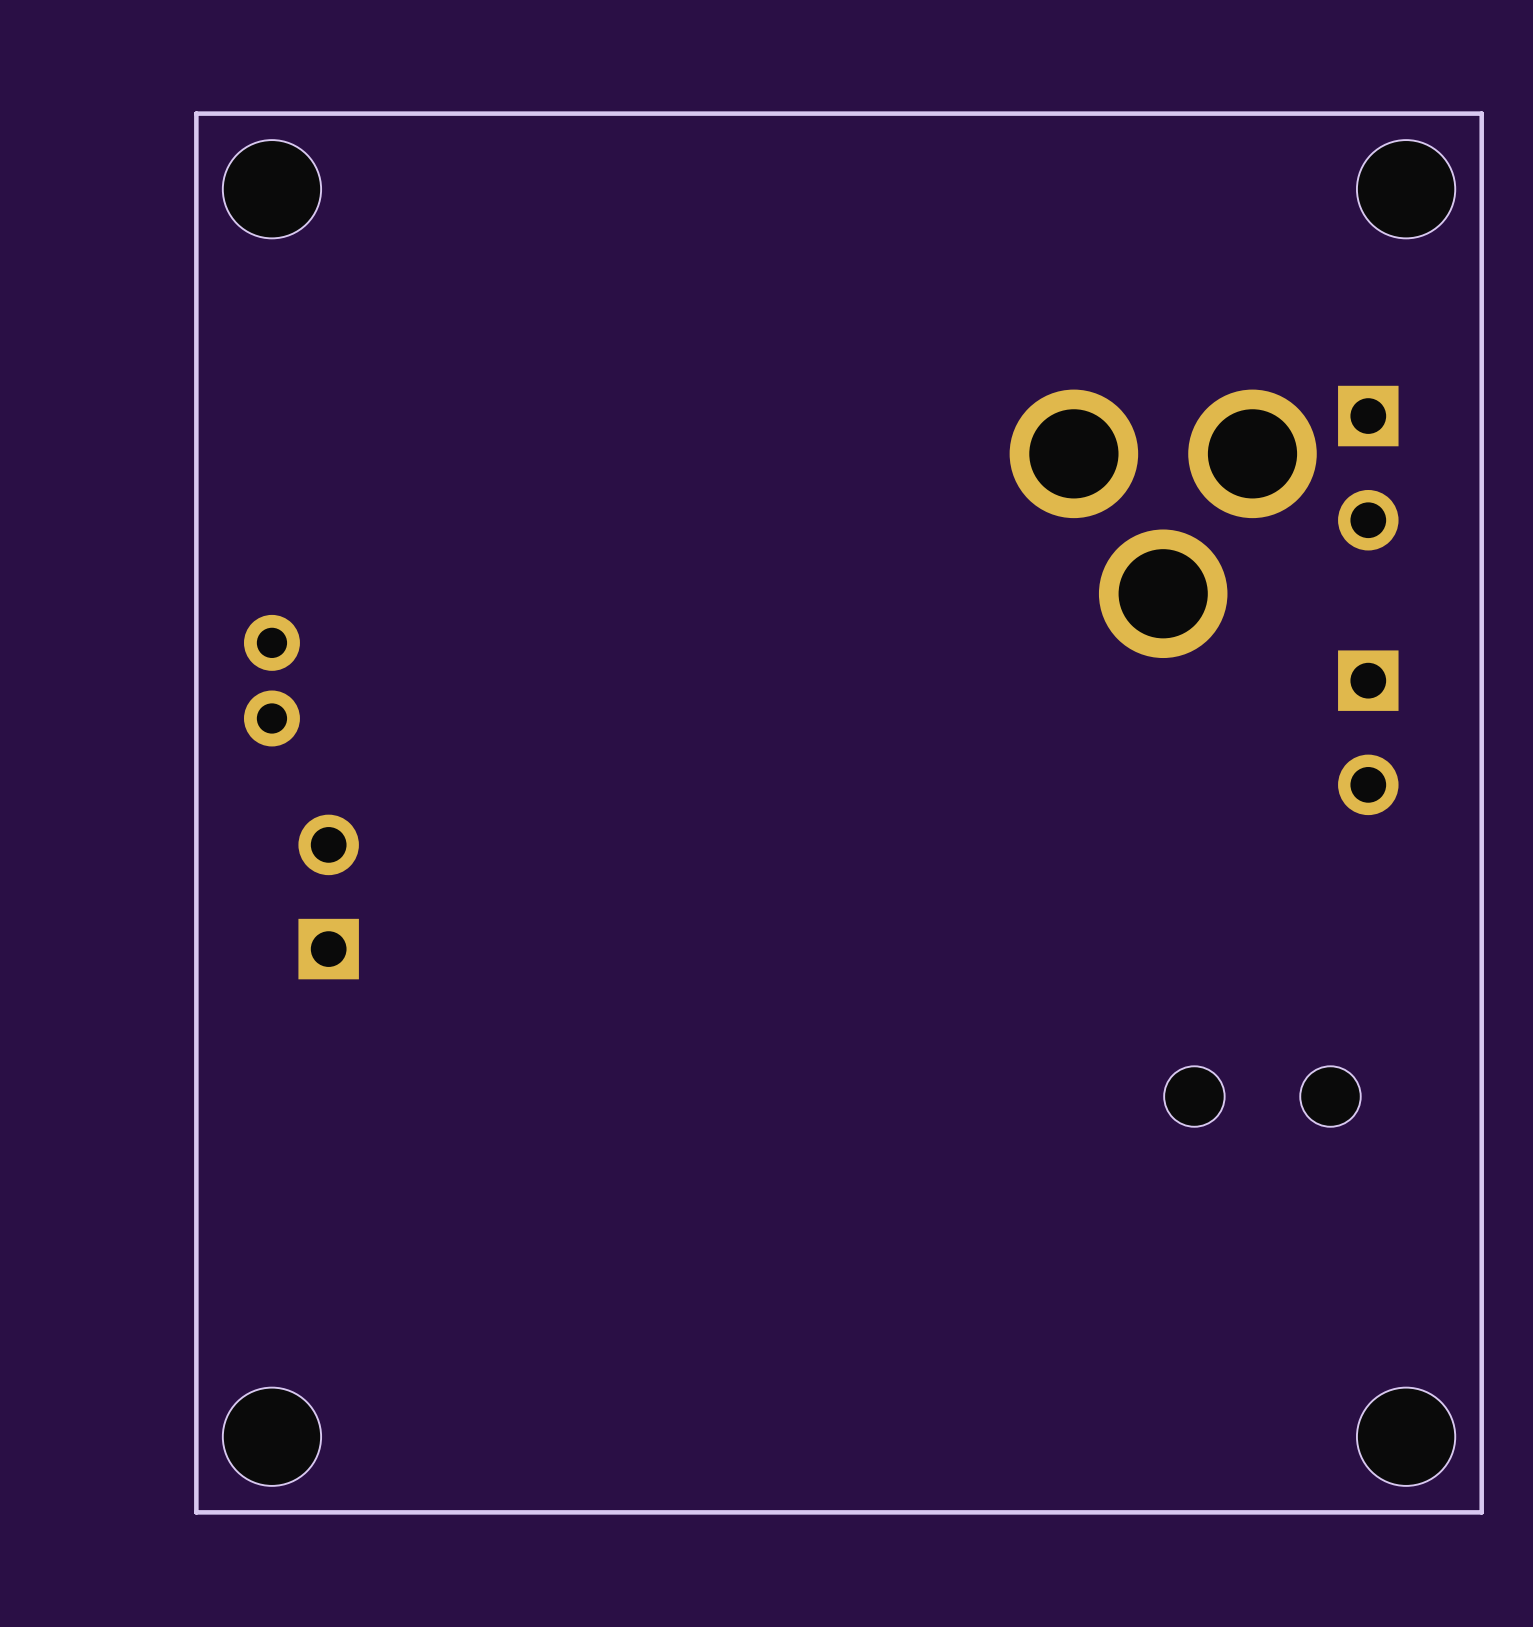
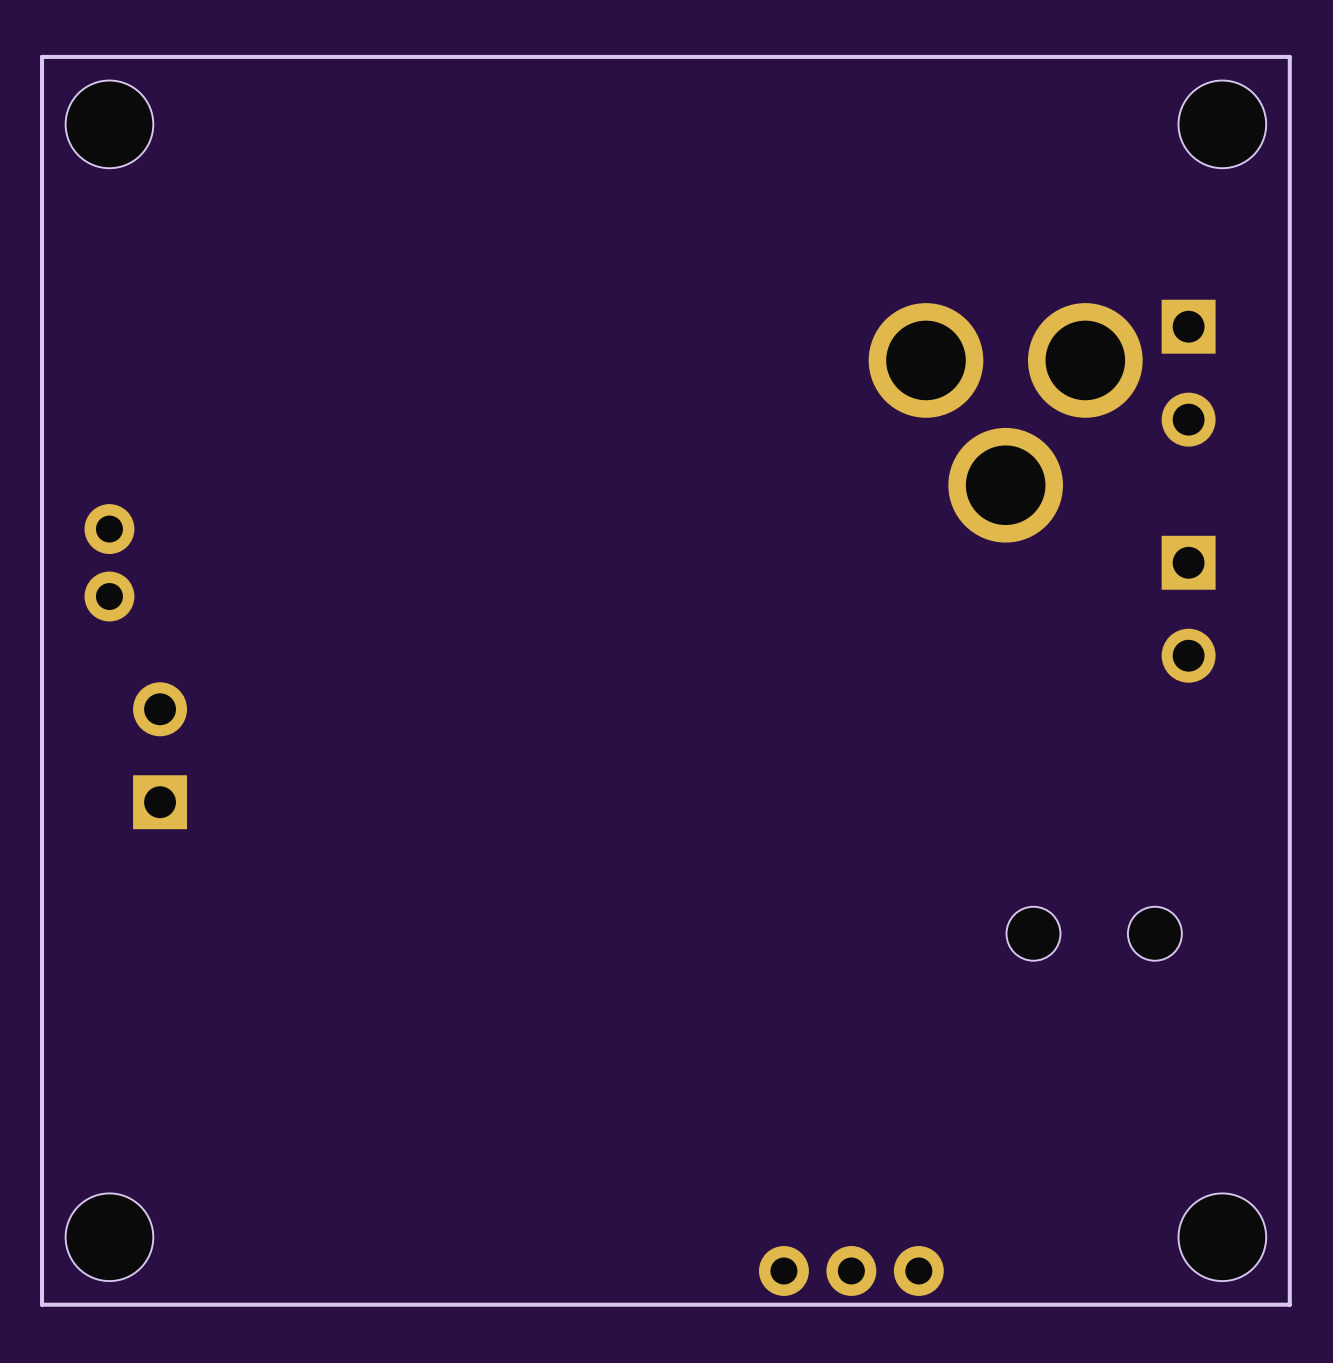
board edge: (196, 113) (196, 1512) -> (143, 56) (42, 56) (42, 1304) (143, 1304)
part position: (271, 189) -> (109, 124)
part position: (271, 680) -> (109, 562)
part position: (328, 896) -> (160, 755)
part position: (271, 1436) -> (109, 1237)
part: none -> (851, 1270)

